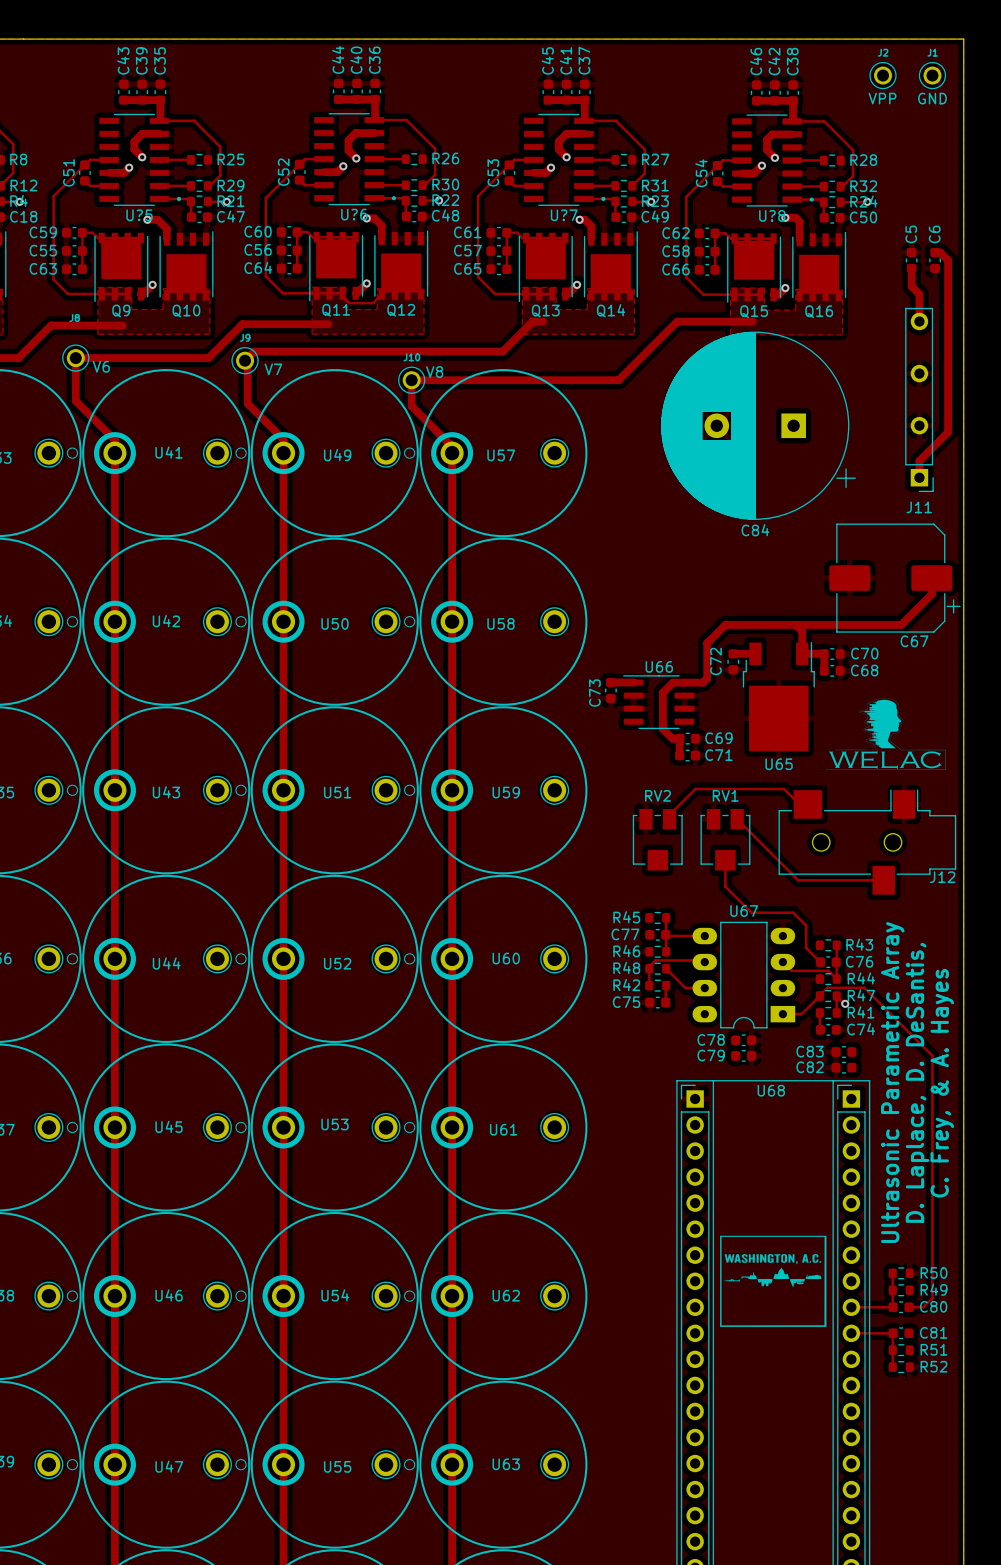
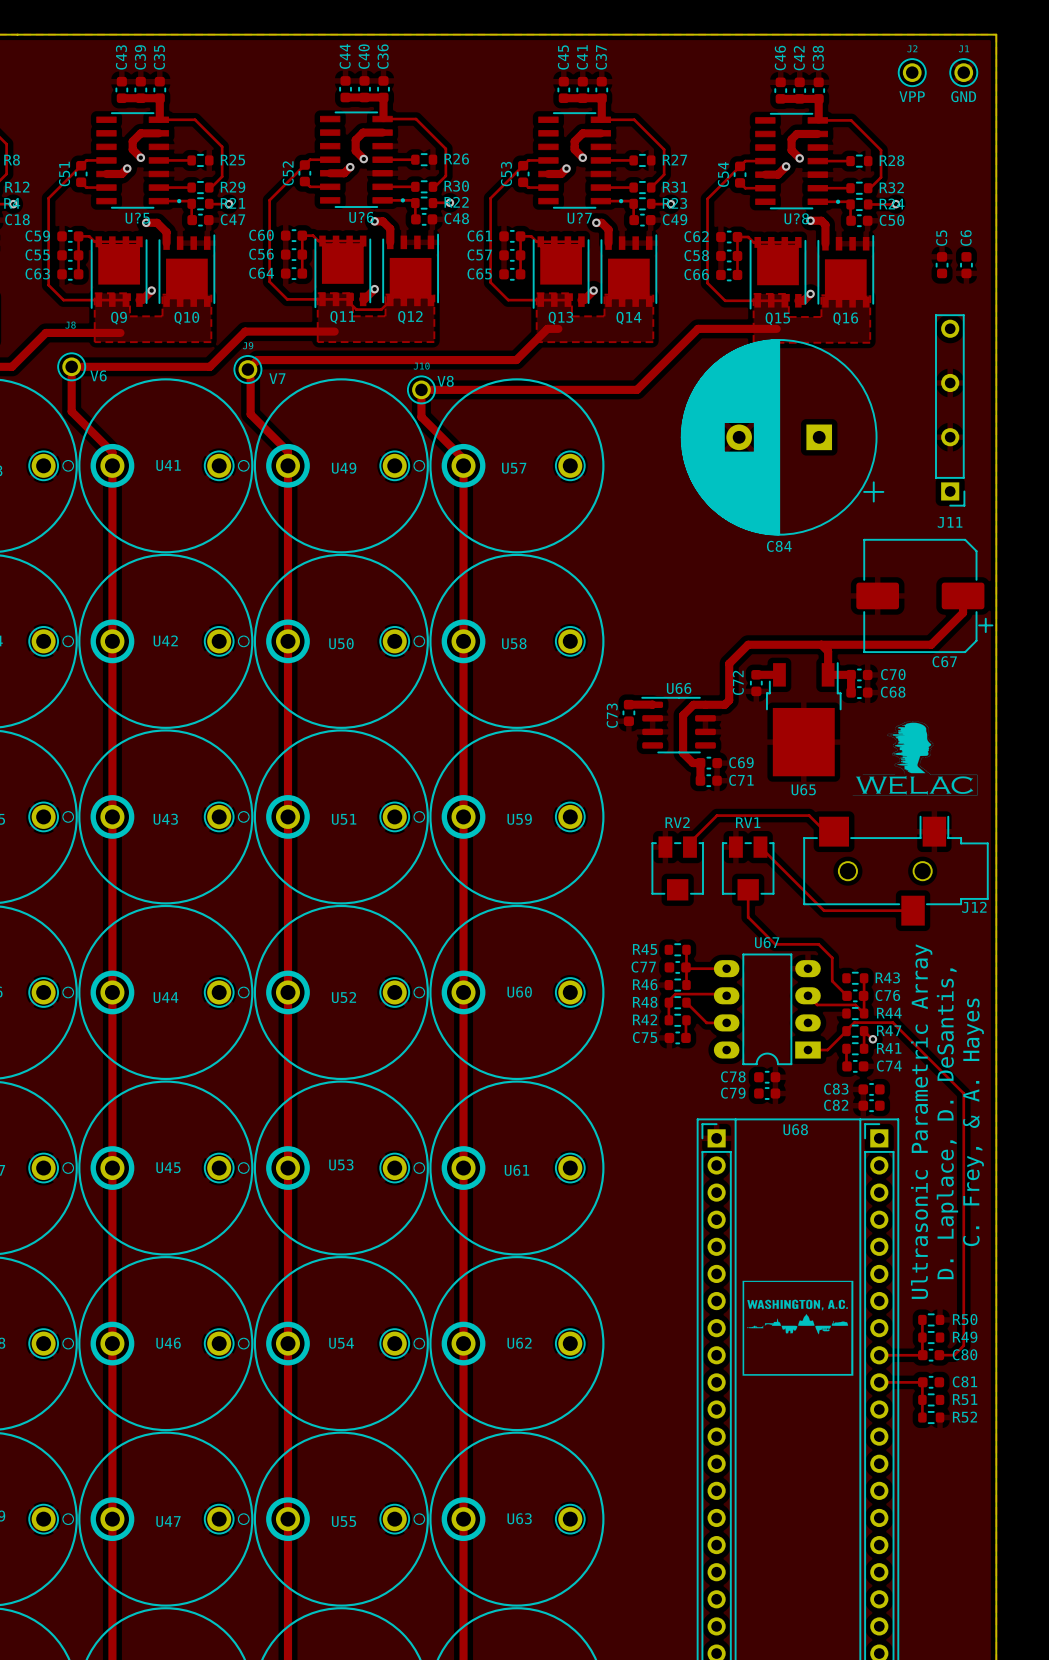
track: (935, 252) (940, 252) (948, 260) (948, 432) (919, 460) (919, 477) -> none
track: (911, 268) (911, 286) (919, 294) (919, 321) -> none

